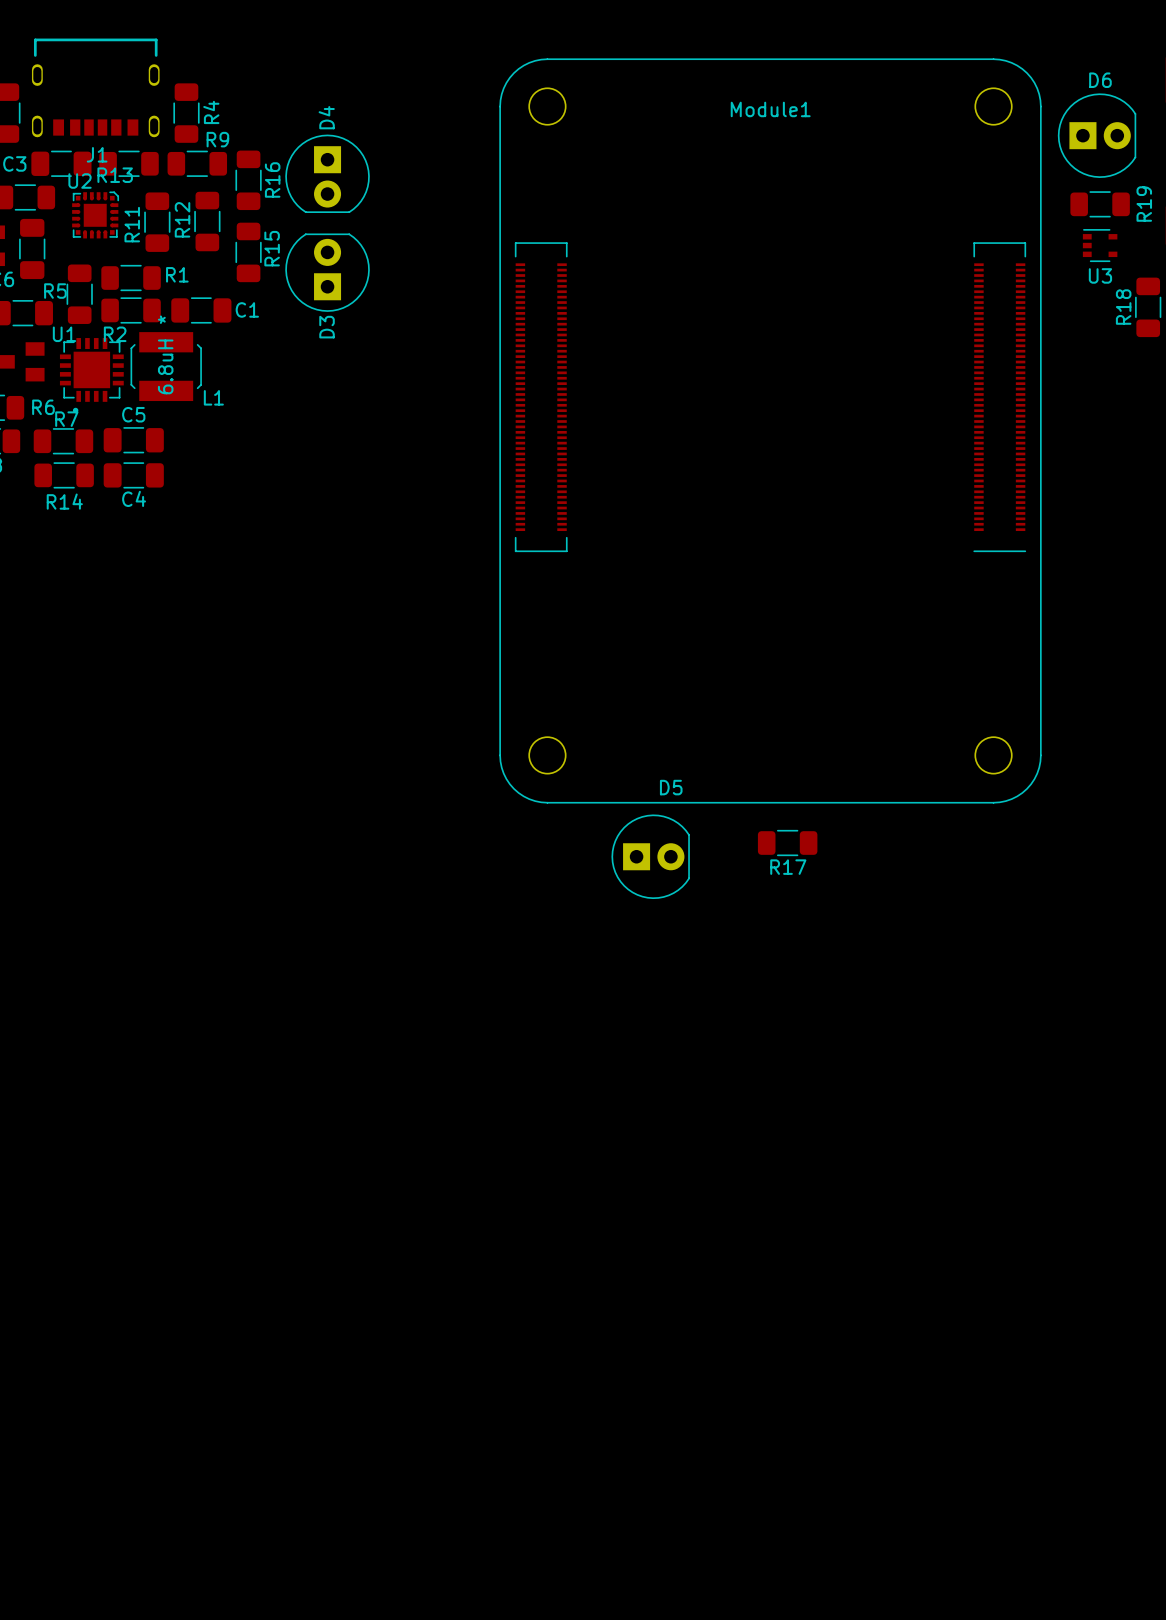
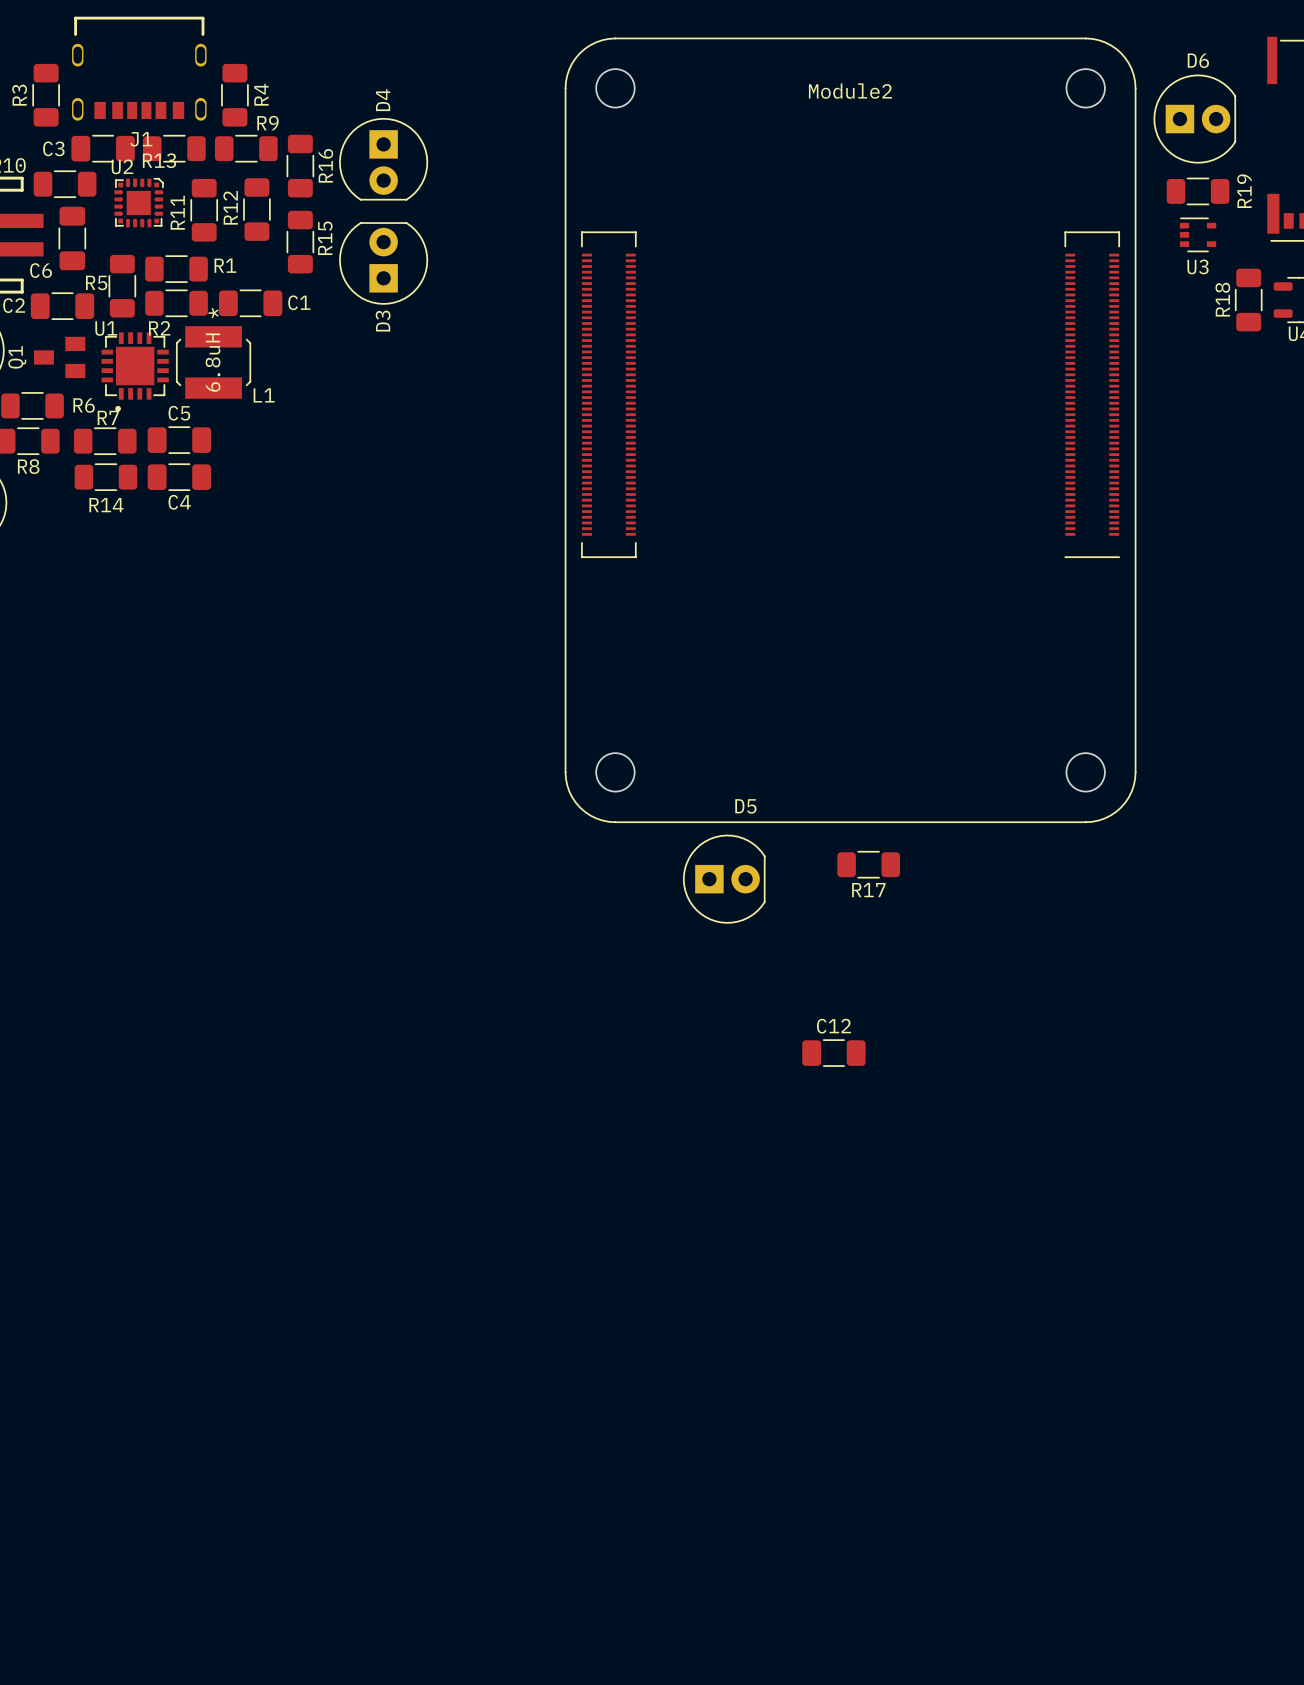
Module1 name: Module1 (770, 109) -> Module2 (850, 91)
C12: none -> (833, 1053)

